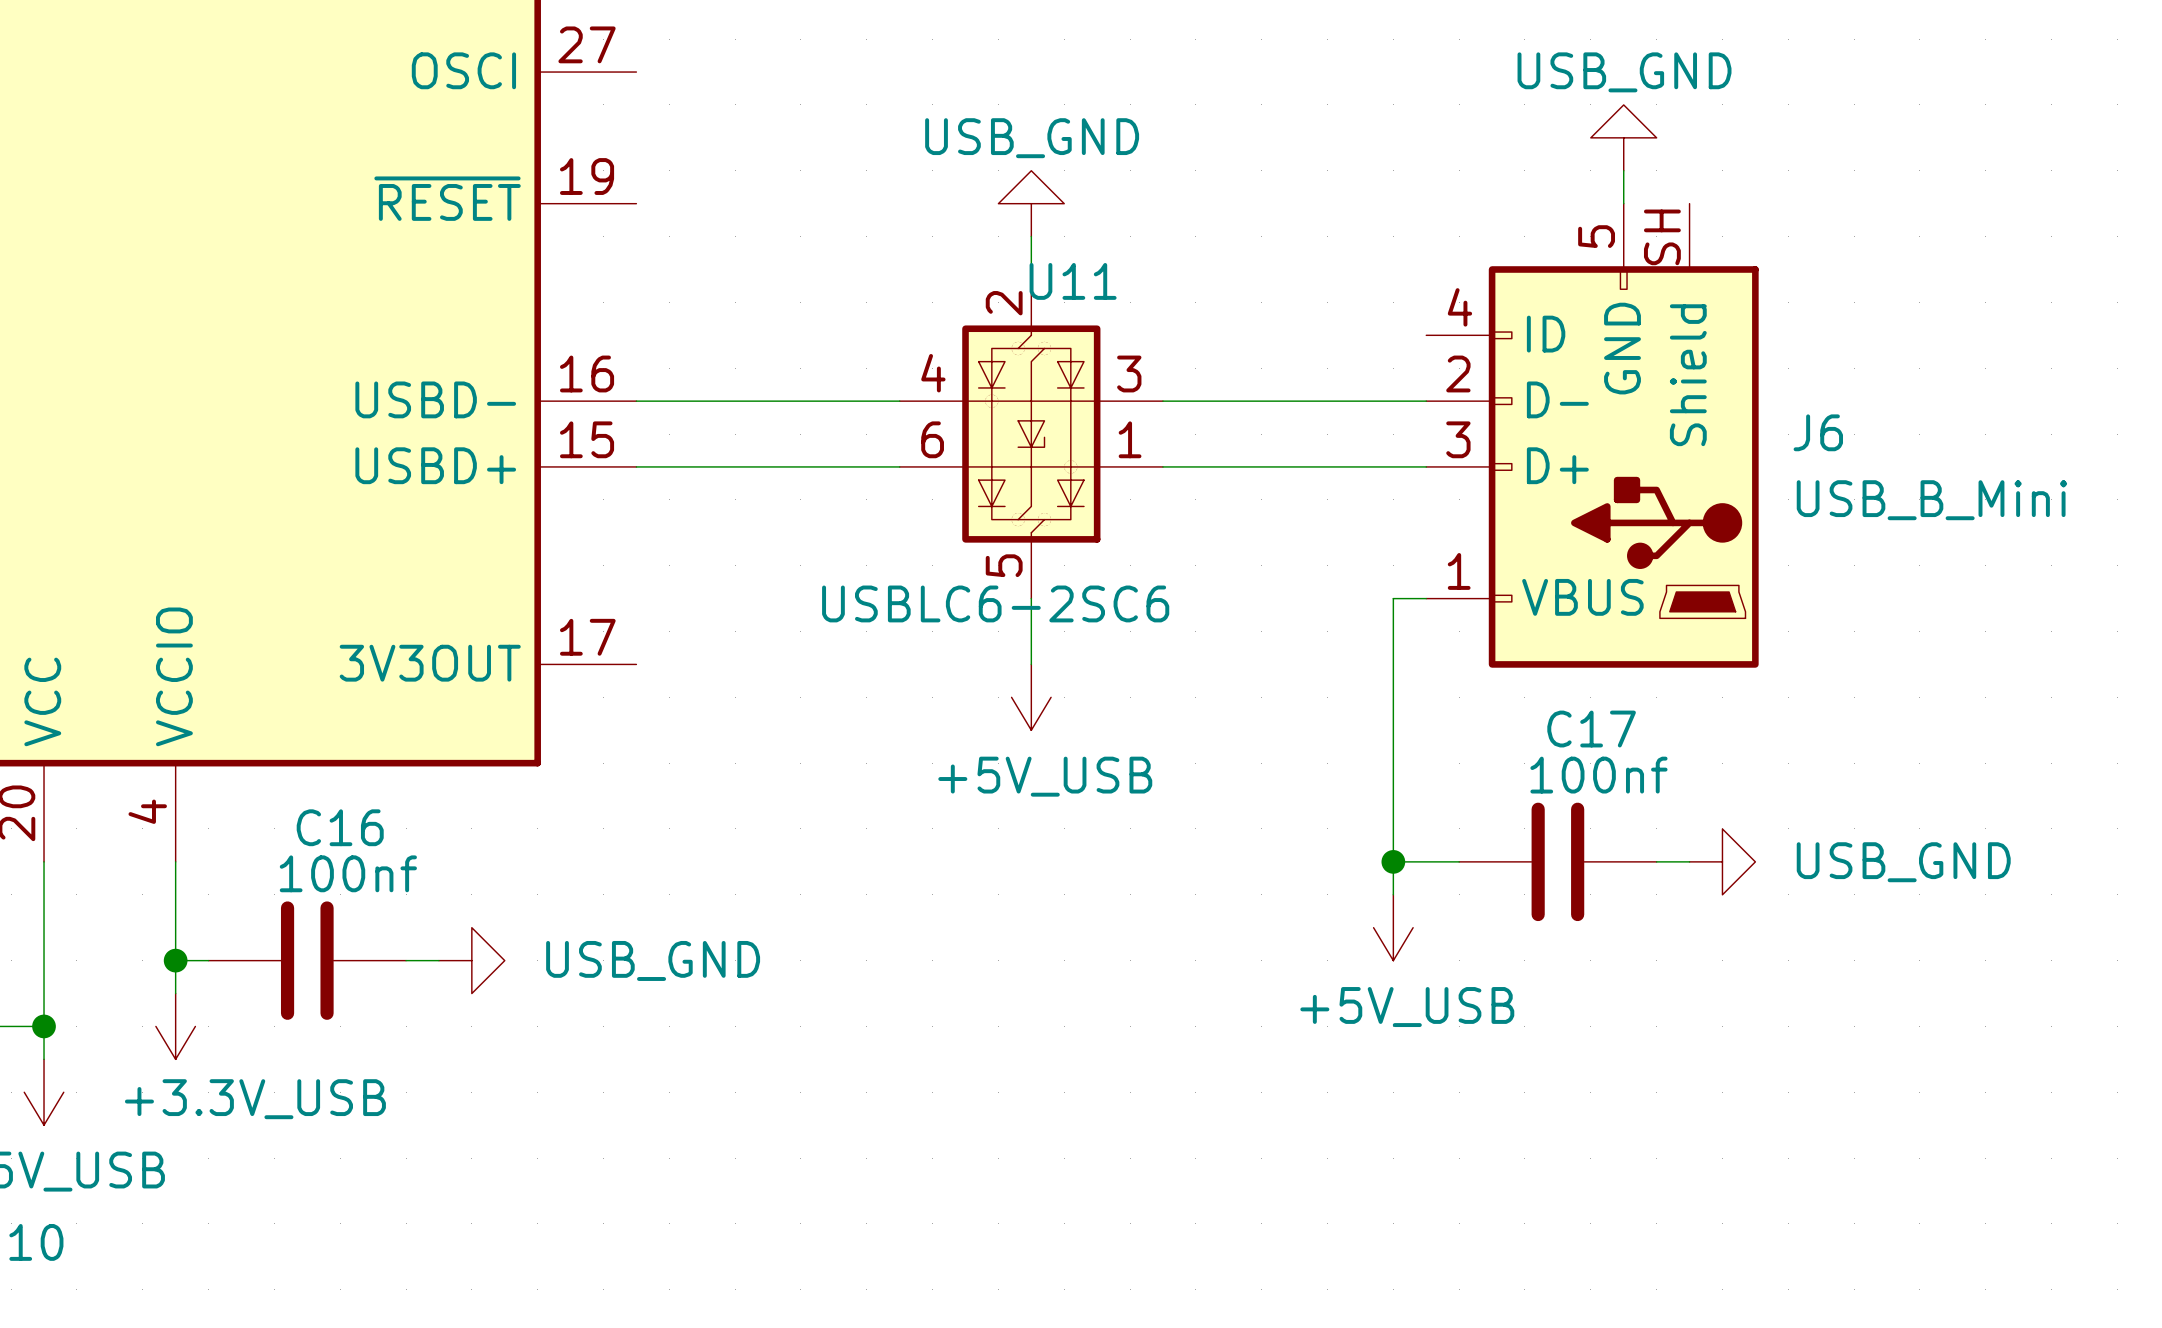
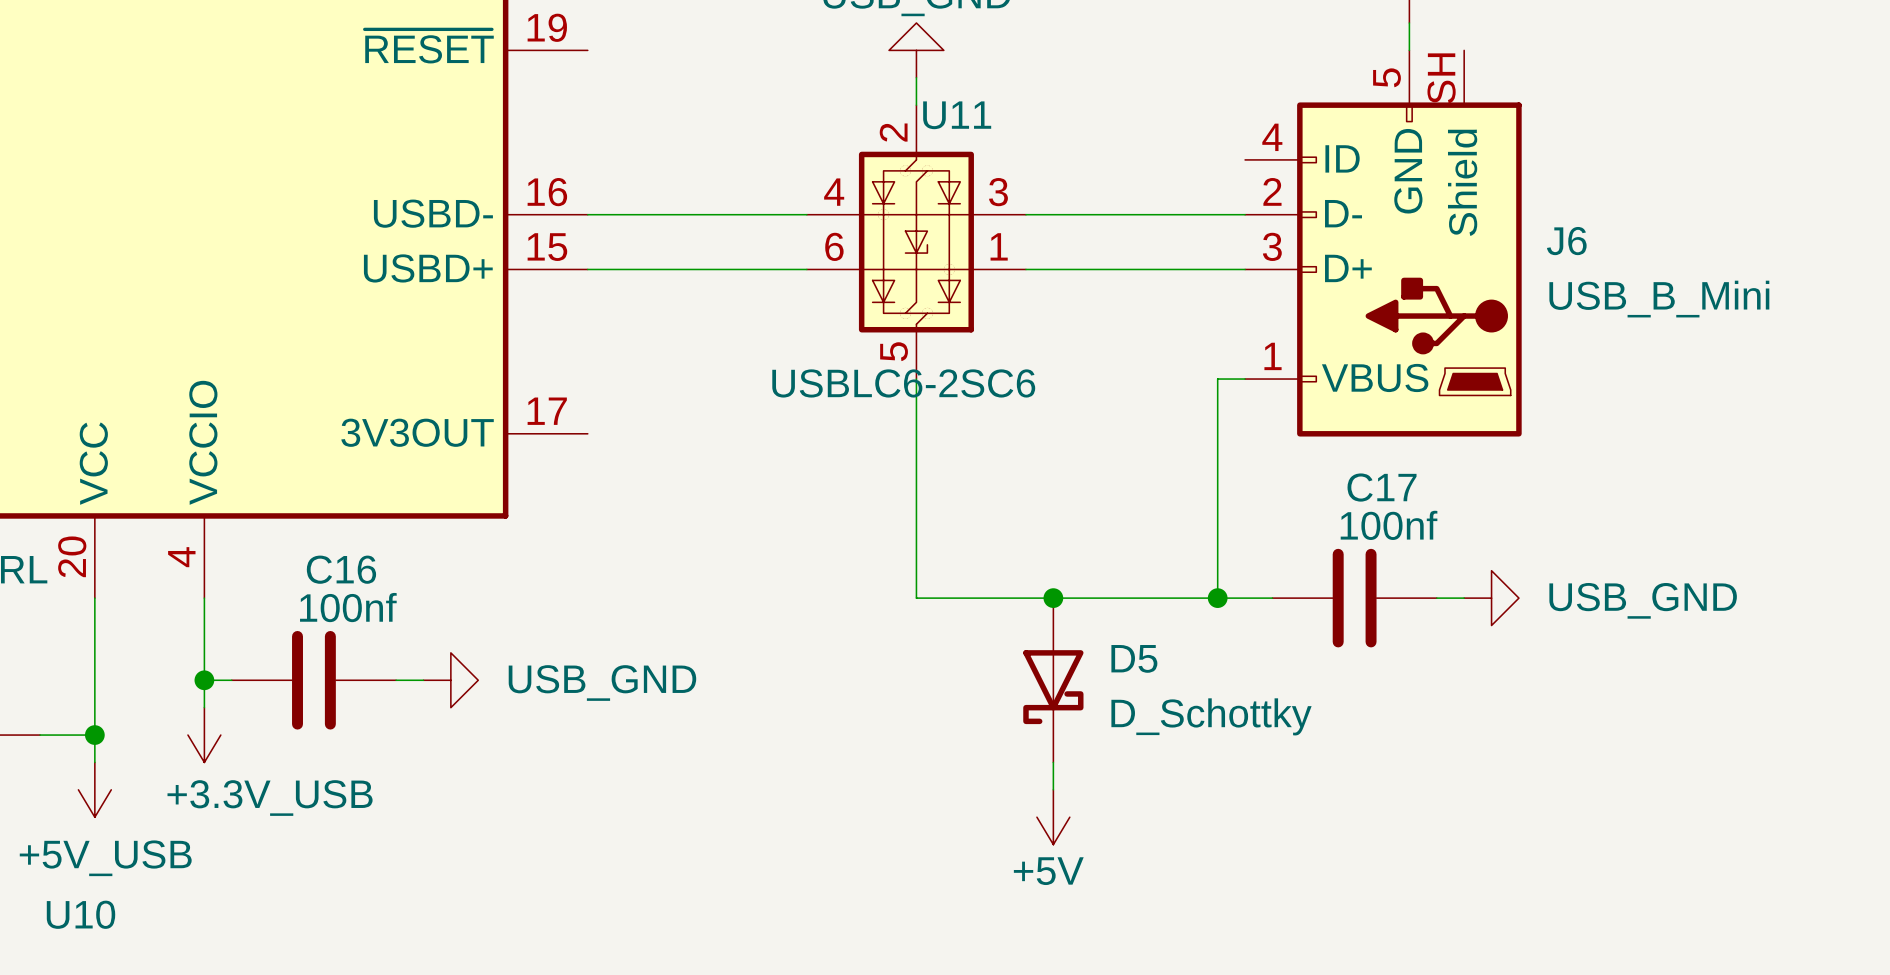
power symbol: +5V_USB (1031, 697) -> none
junction: none -> (1053, 598)
wire: (1393, 861) (1393, 894) -> (1217, 598) (916, 598) (916, 433)
power symbol: +5V_USB (1393, 927) -> none
D5: none -> D_Schottky (1053, 680)
wire: none -> (1053, 762) (1053, 789)
power symbol: none -> +5V (1053, 817)

